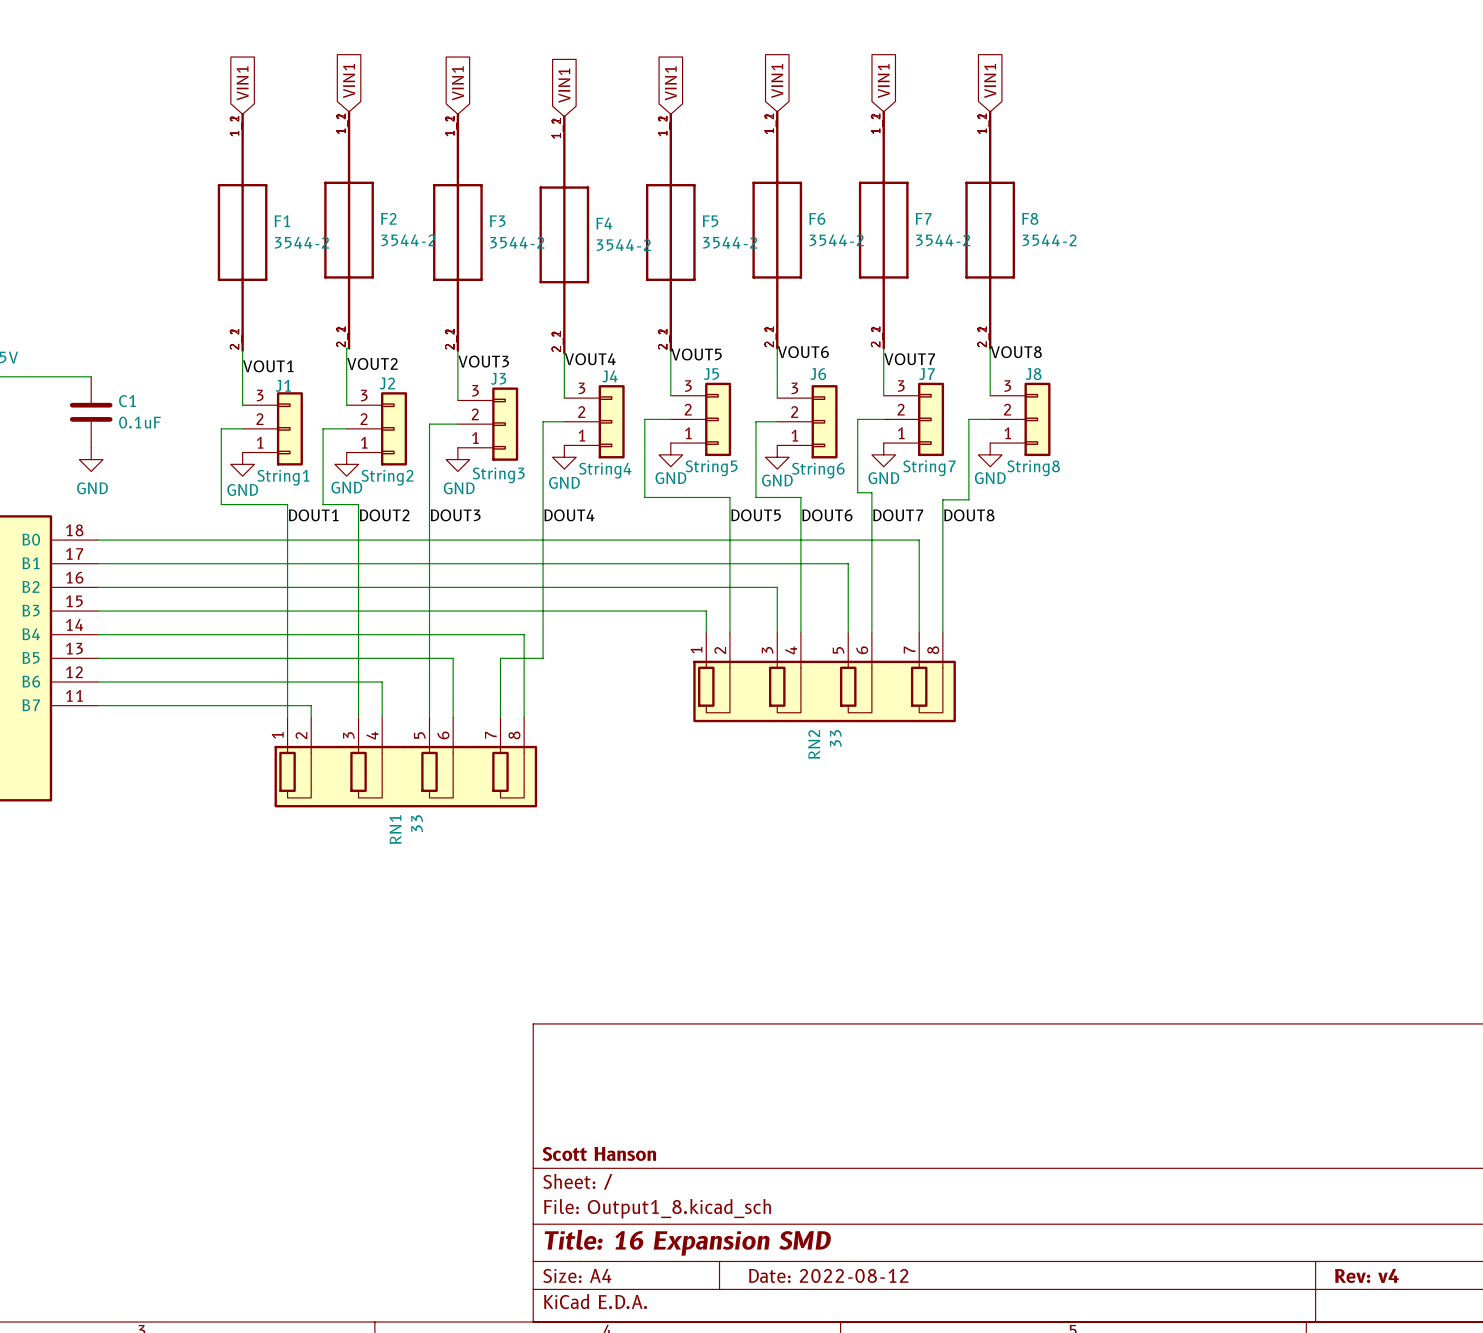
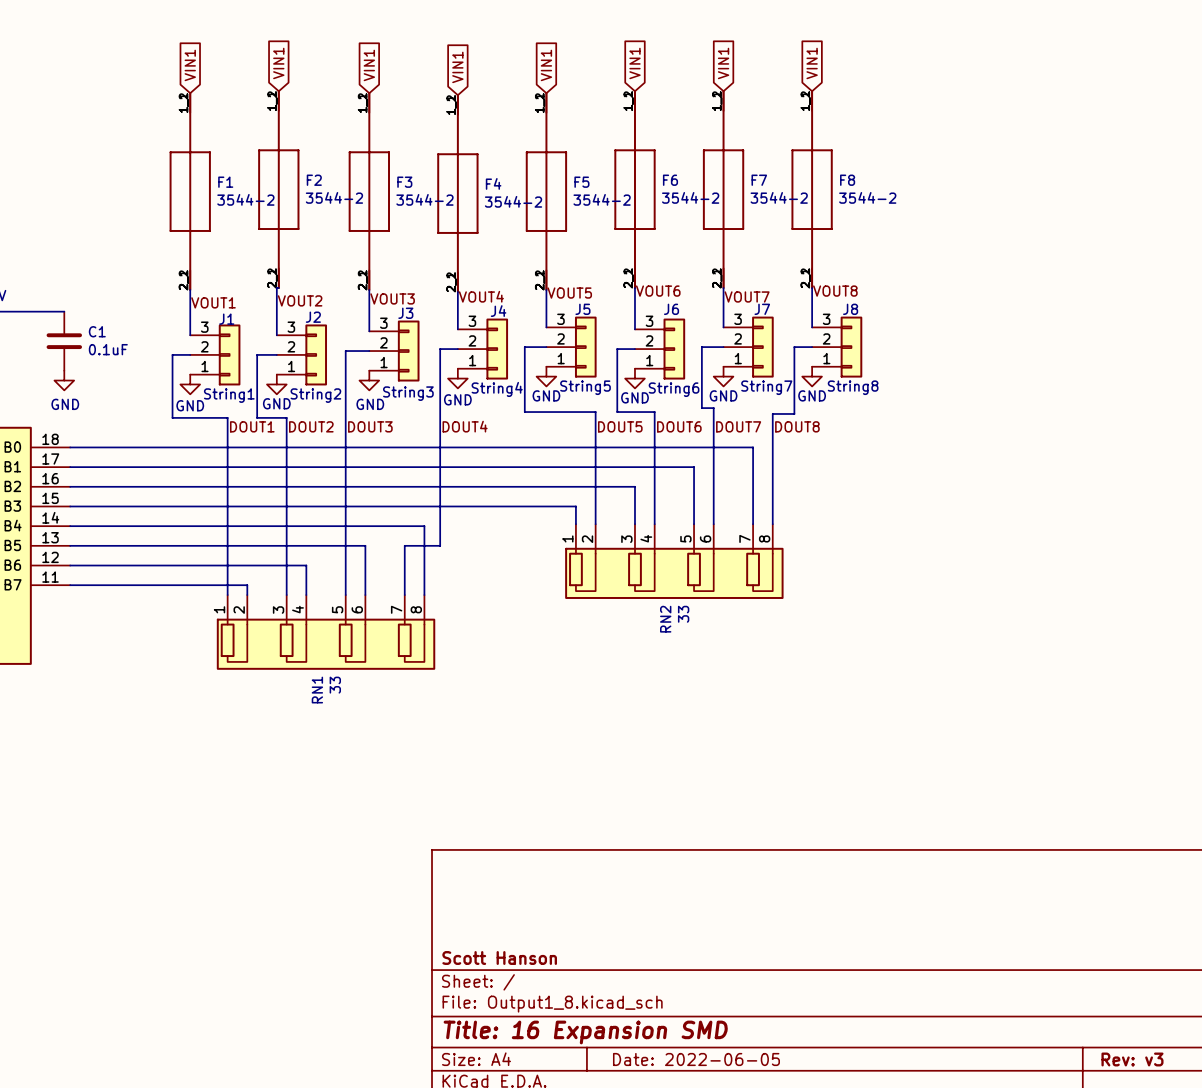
title block: Date: 2022-08-12 (828, 1275) -> Date: 2022-06-05 (696, 1059)
title block: Rev: v4 (1366, 1275) -> Rev: v3 (1132, 1059)

